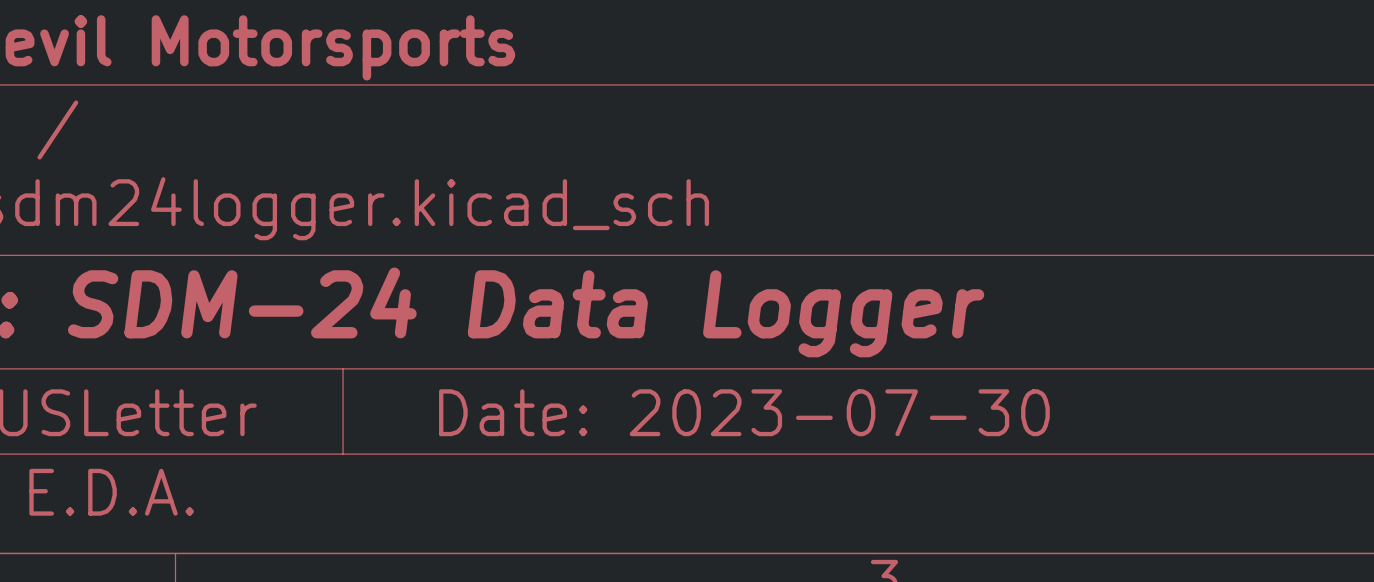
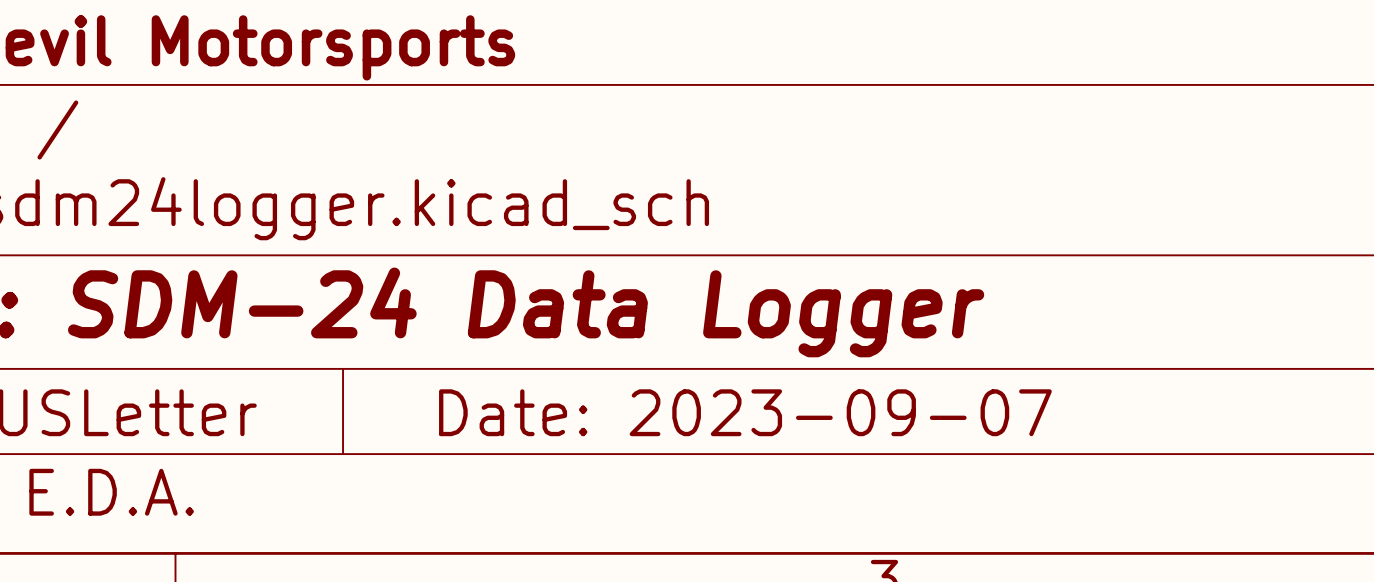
title block: Date: 2023-07-30 (744, 412) -> Date: 2023-09-07 (745, 412)

